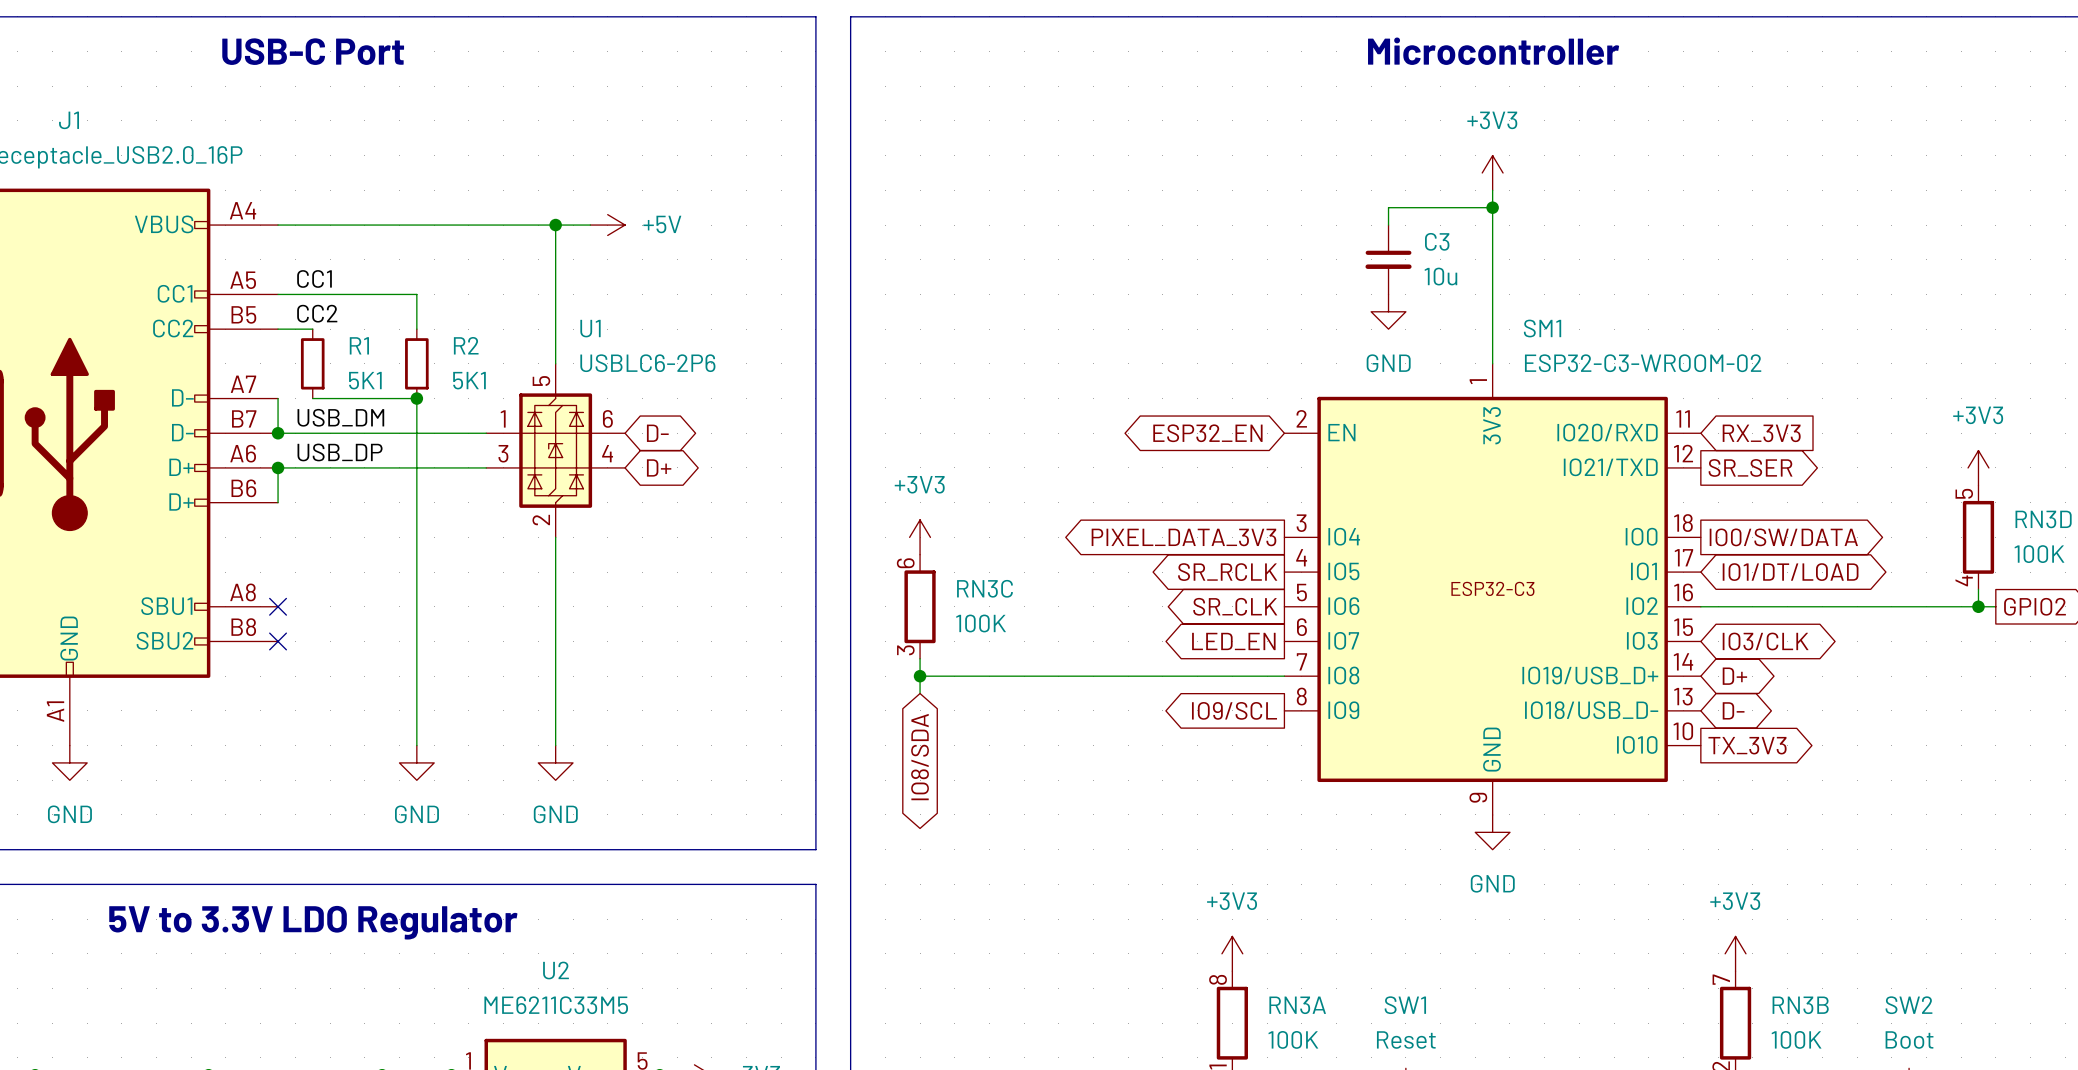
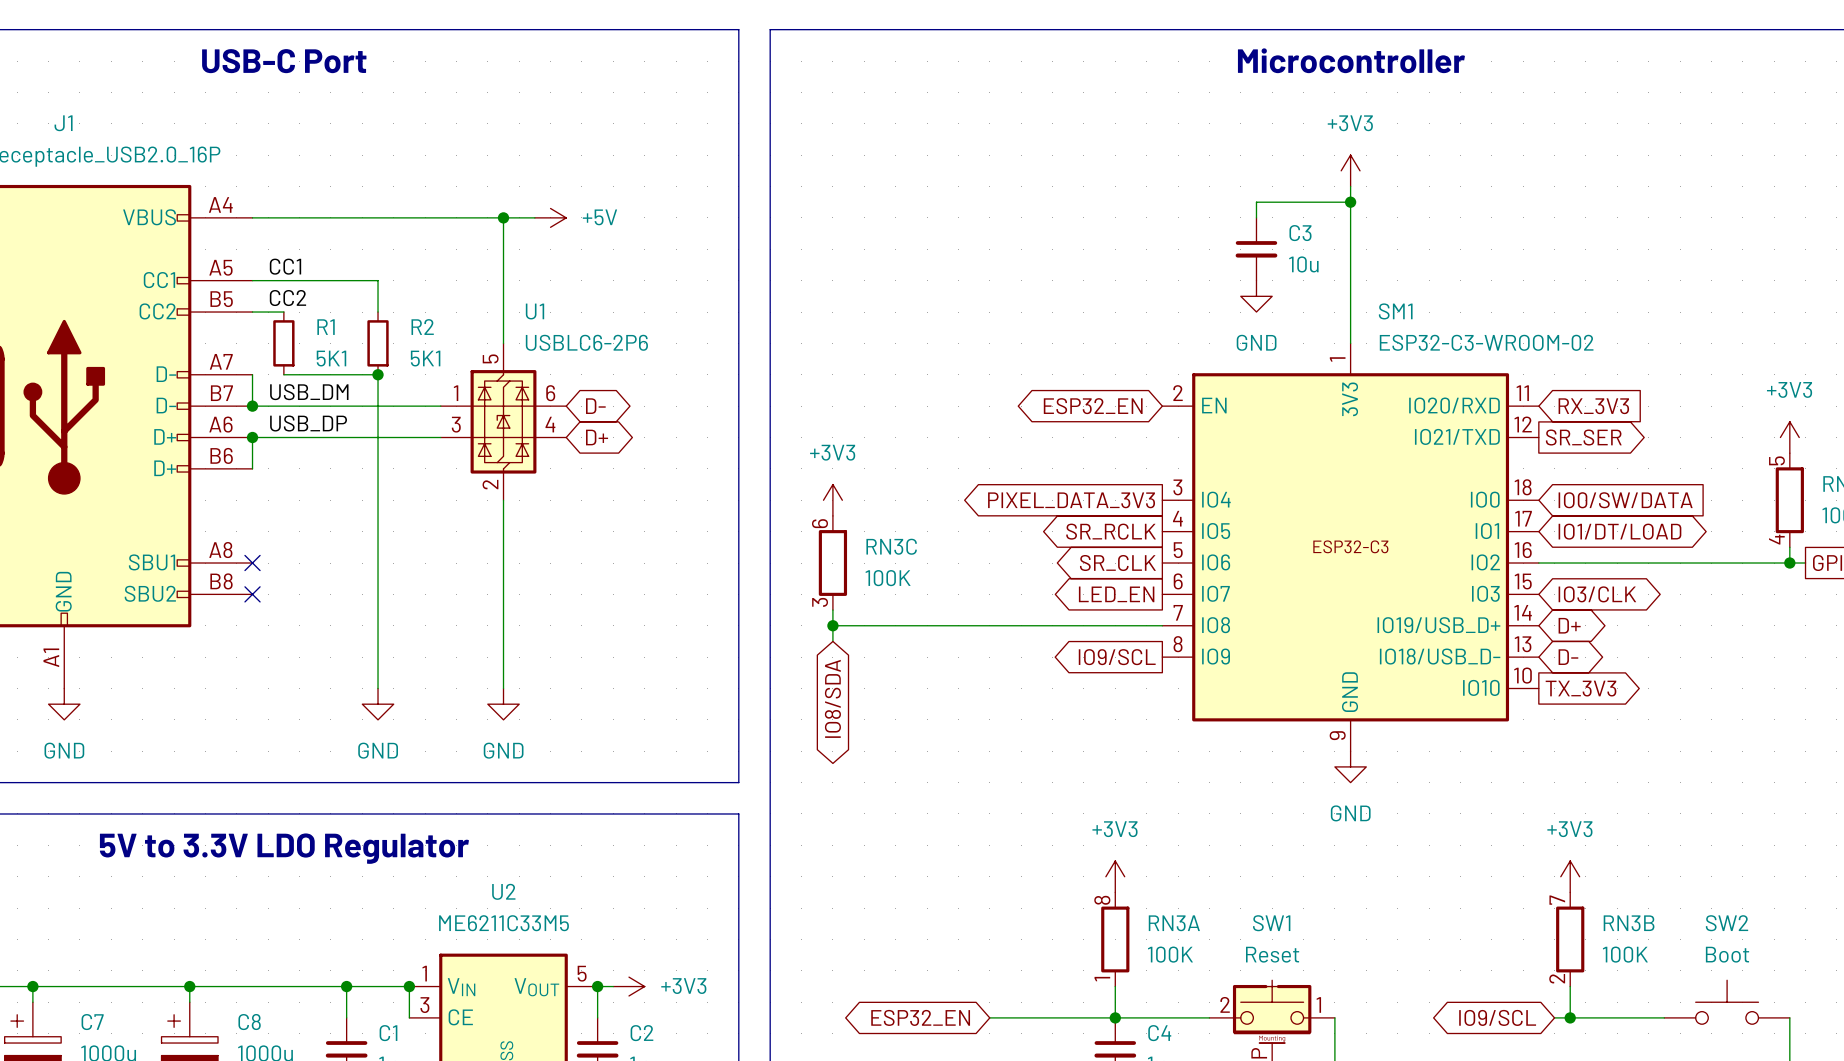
global label shape: output (1783, 537) -> input (1625, 500)

